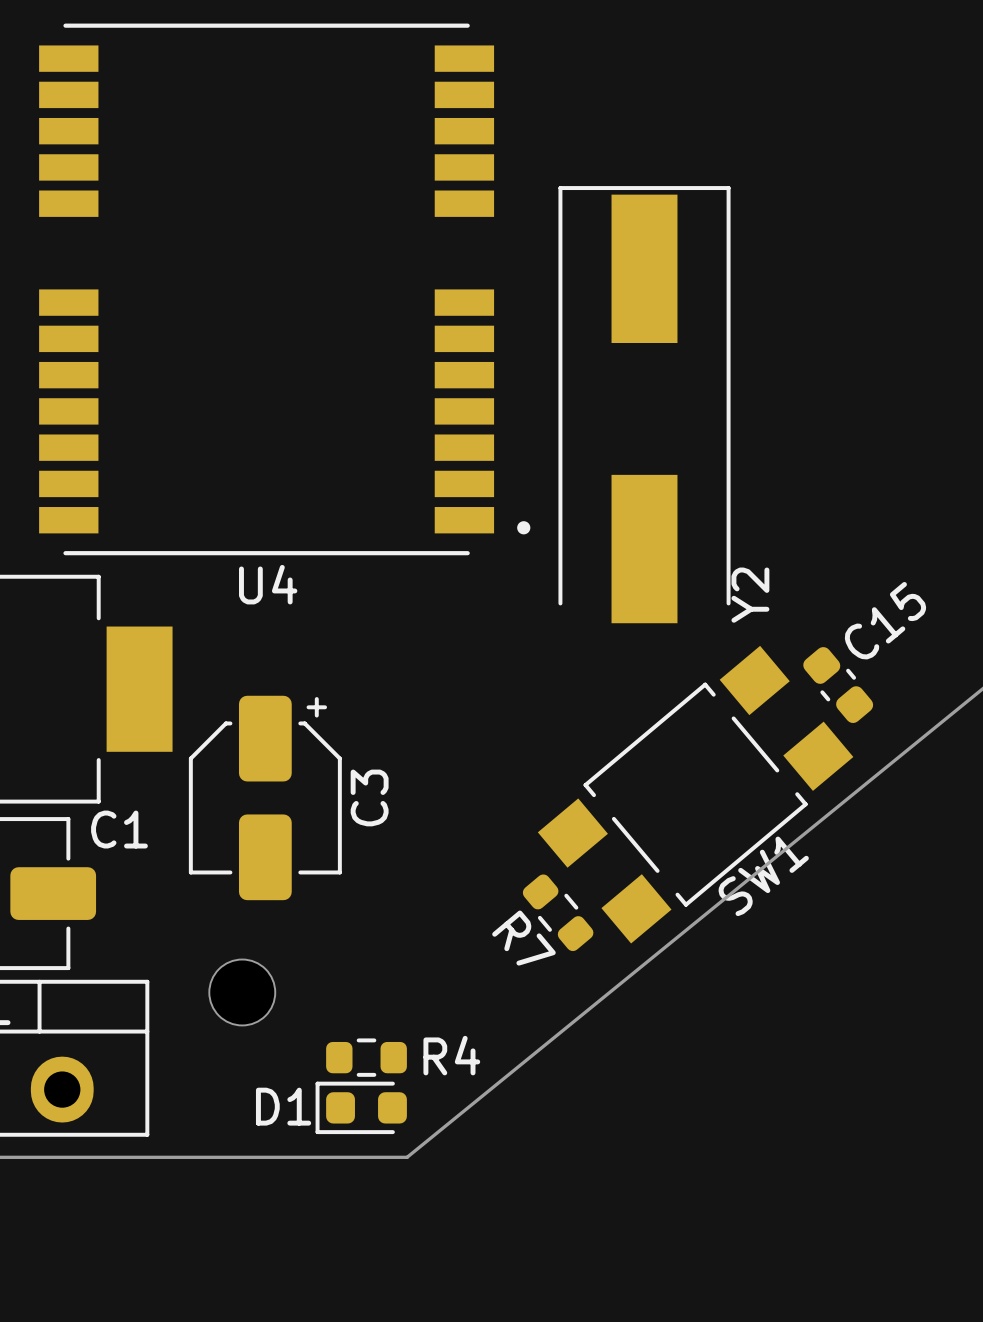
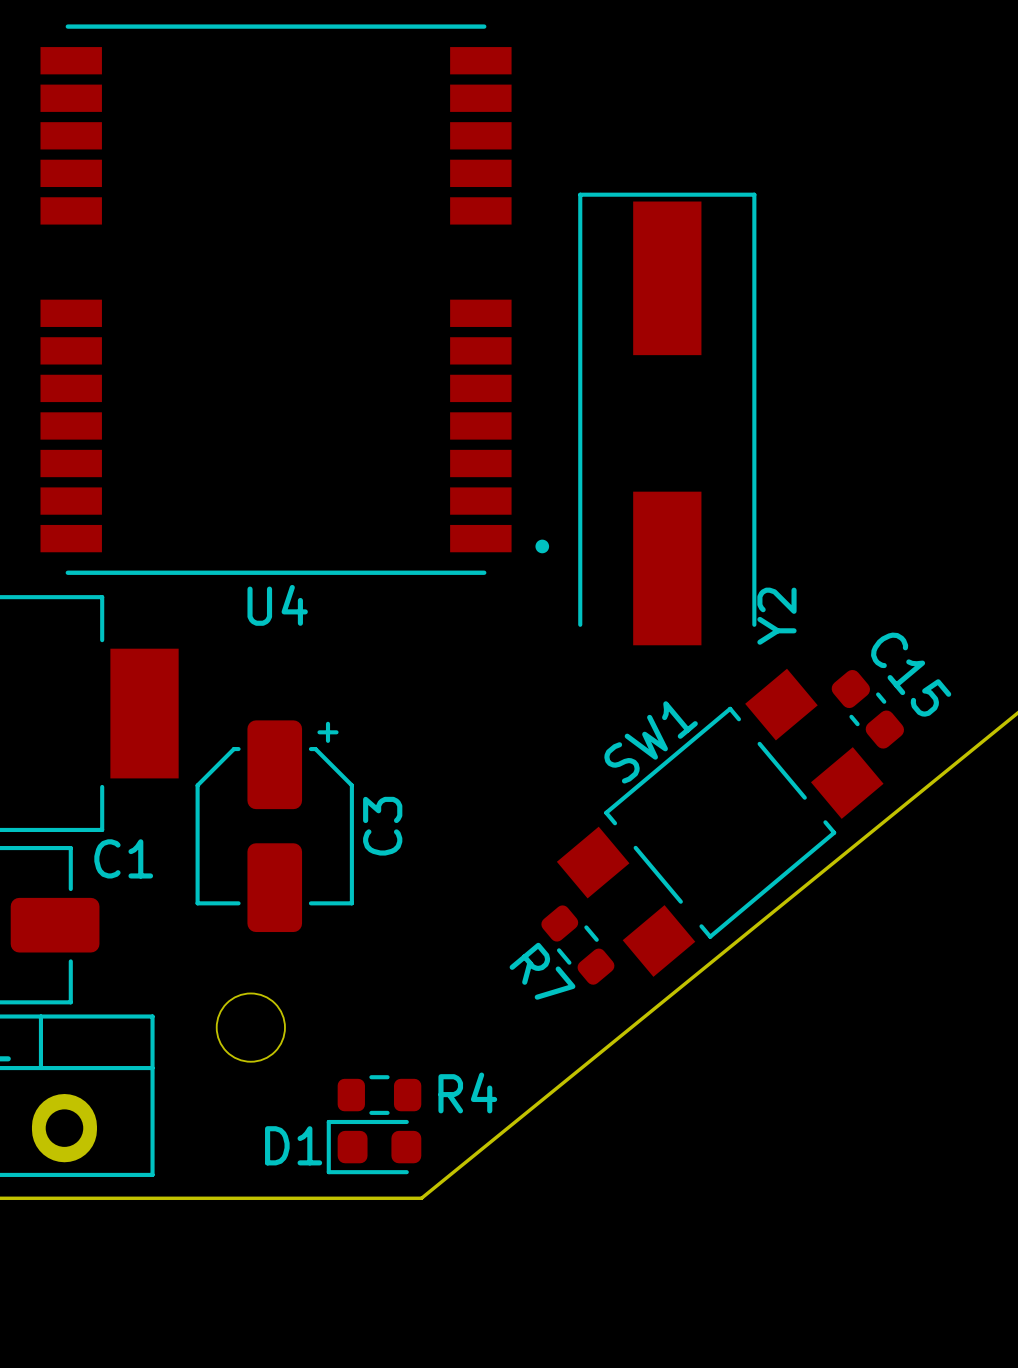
C15 name rotation: 0° (885, 620) -> 90° clockwise (911, 674)
SW1 name position: SW1 (763, 876) -> SW1 (651, 742)

